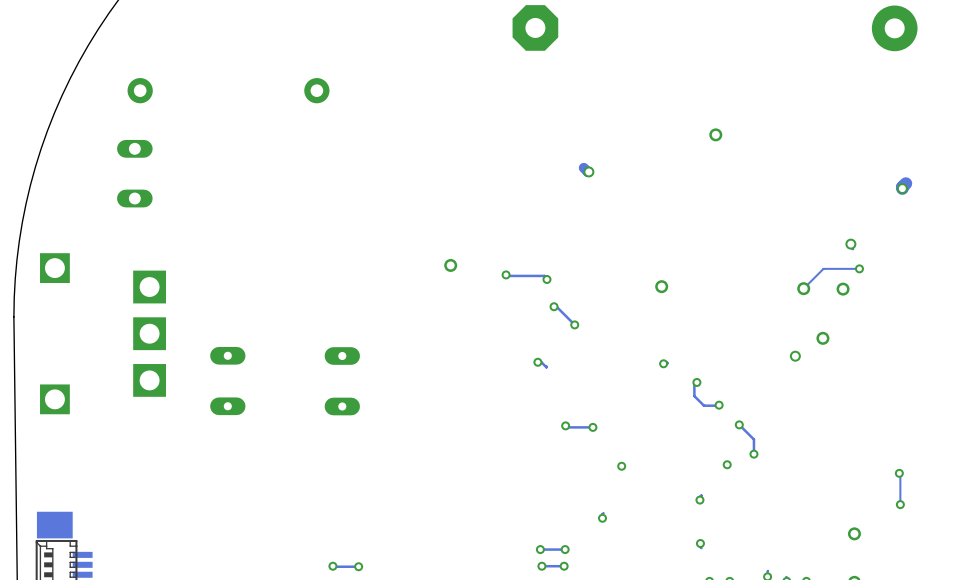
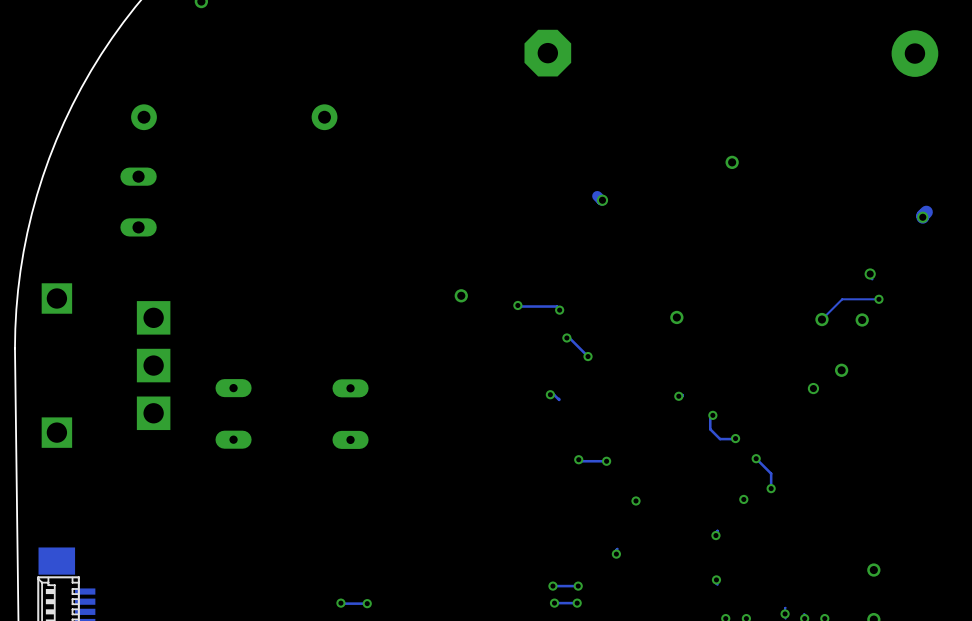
track: (899, 473) (900, 504) -> none
via: (899, 473) -> none
via: (900, 504) -> none

